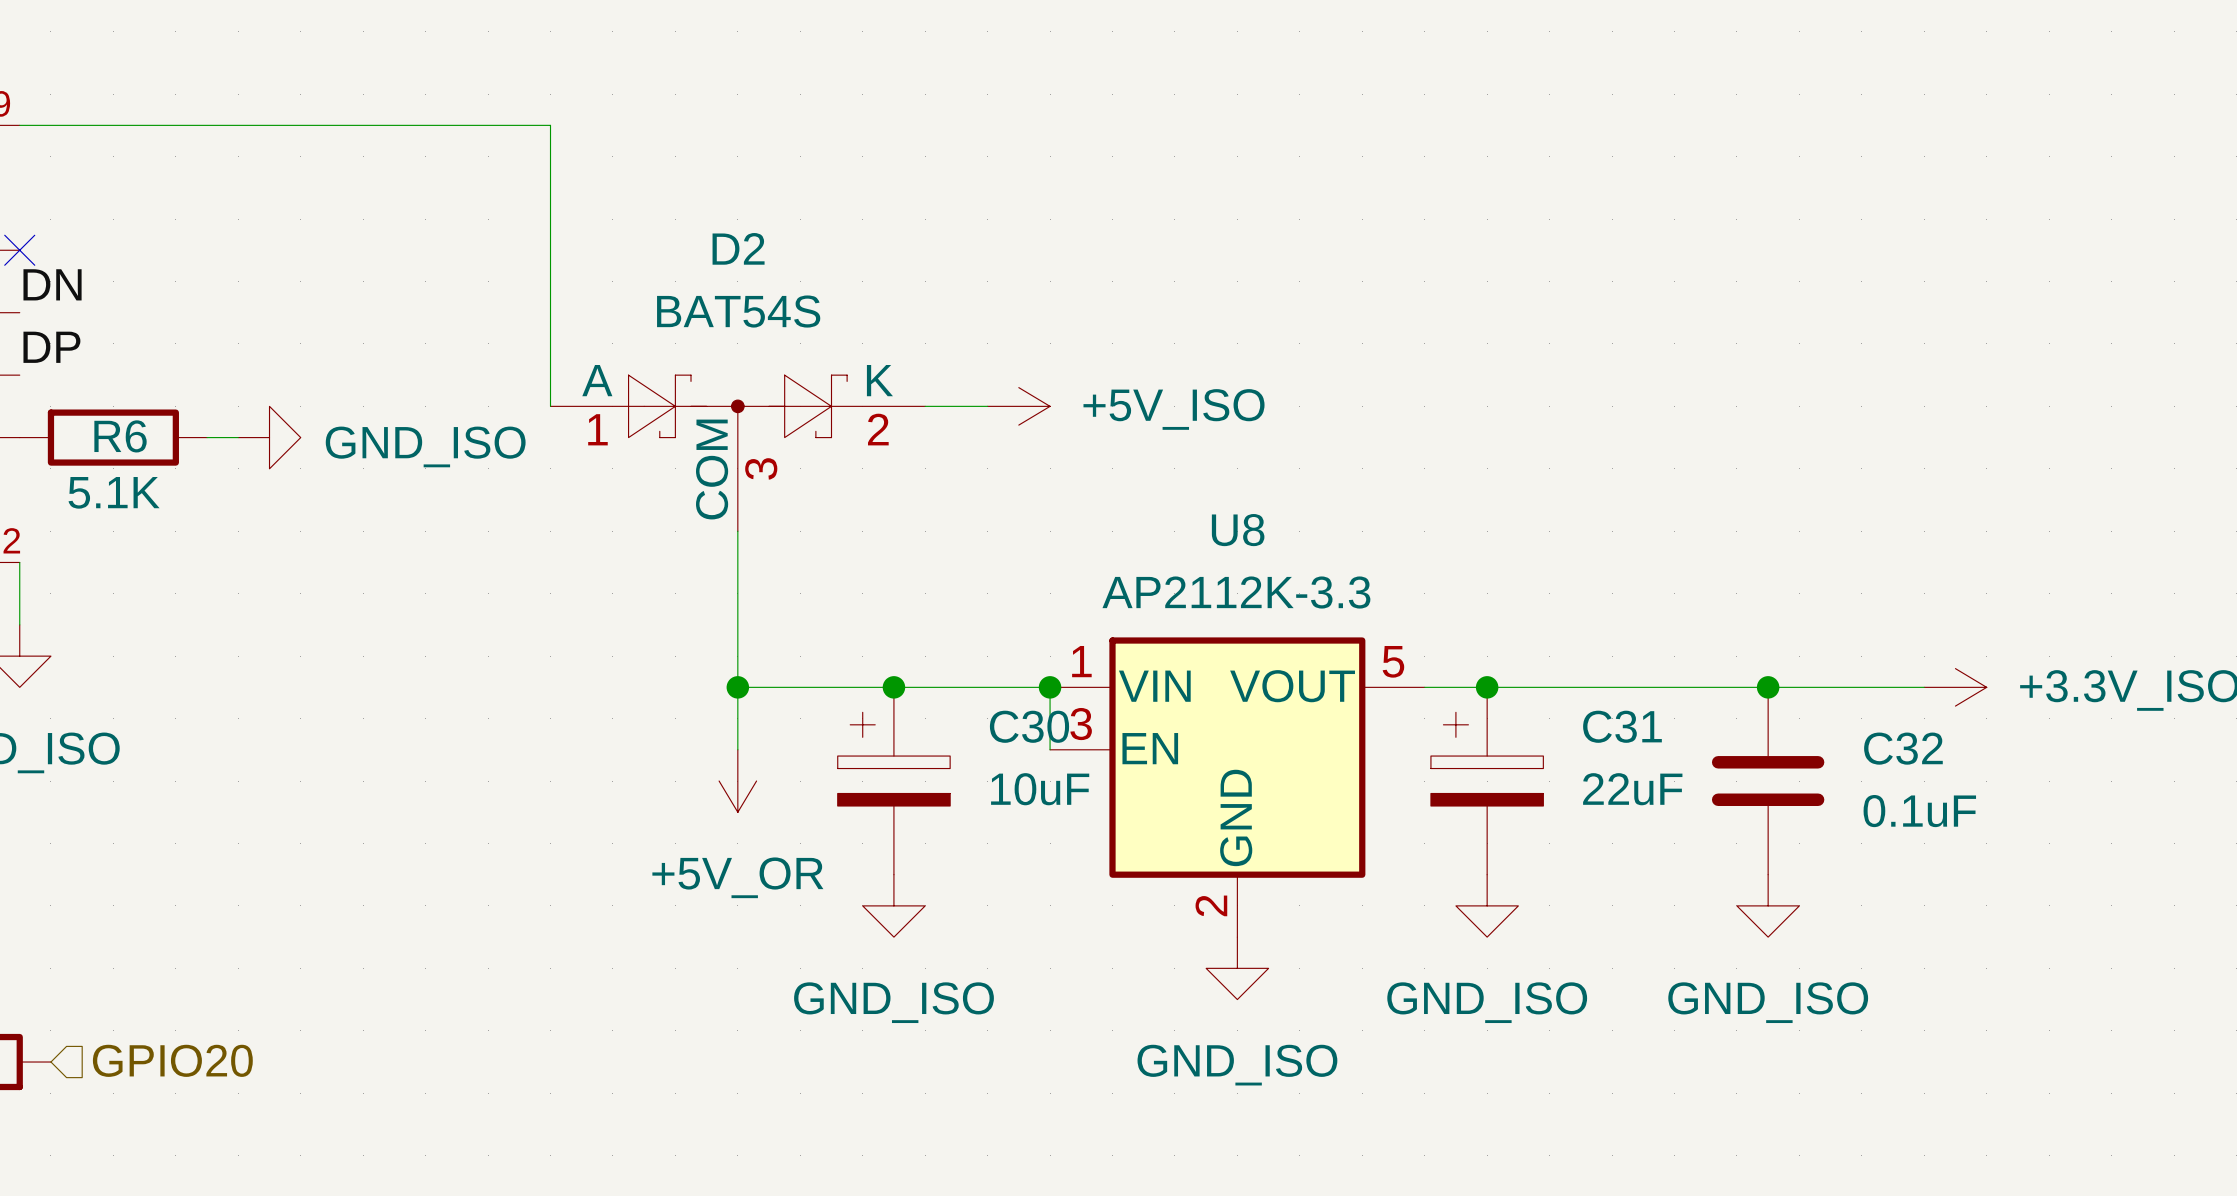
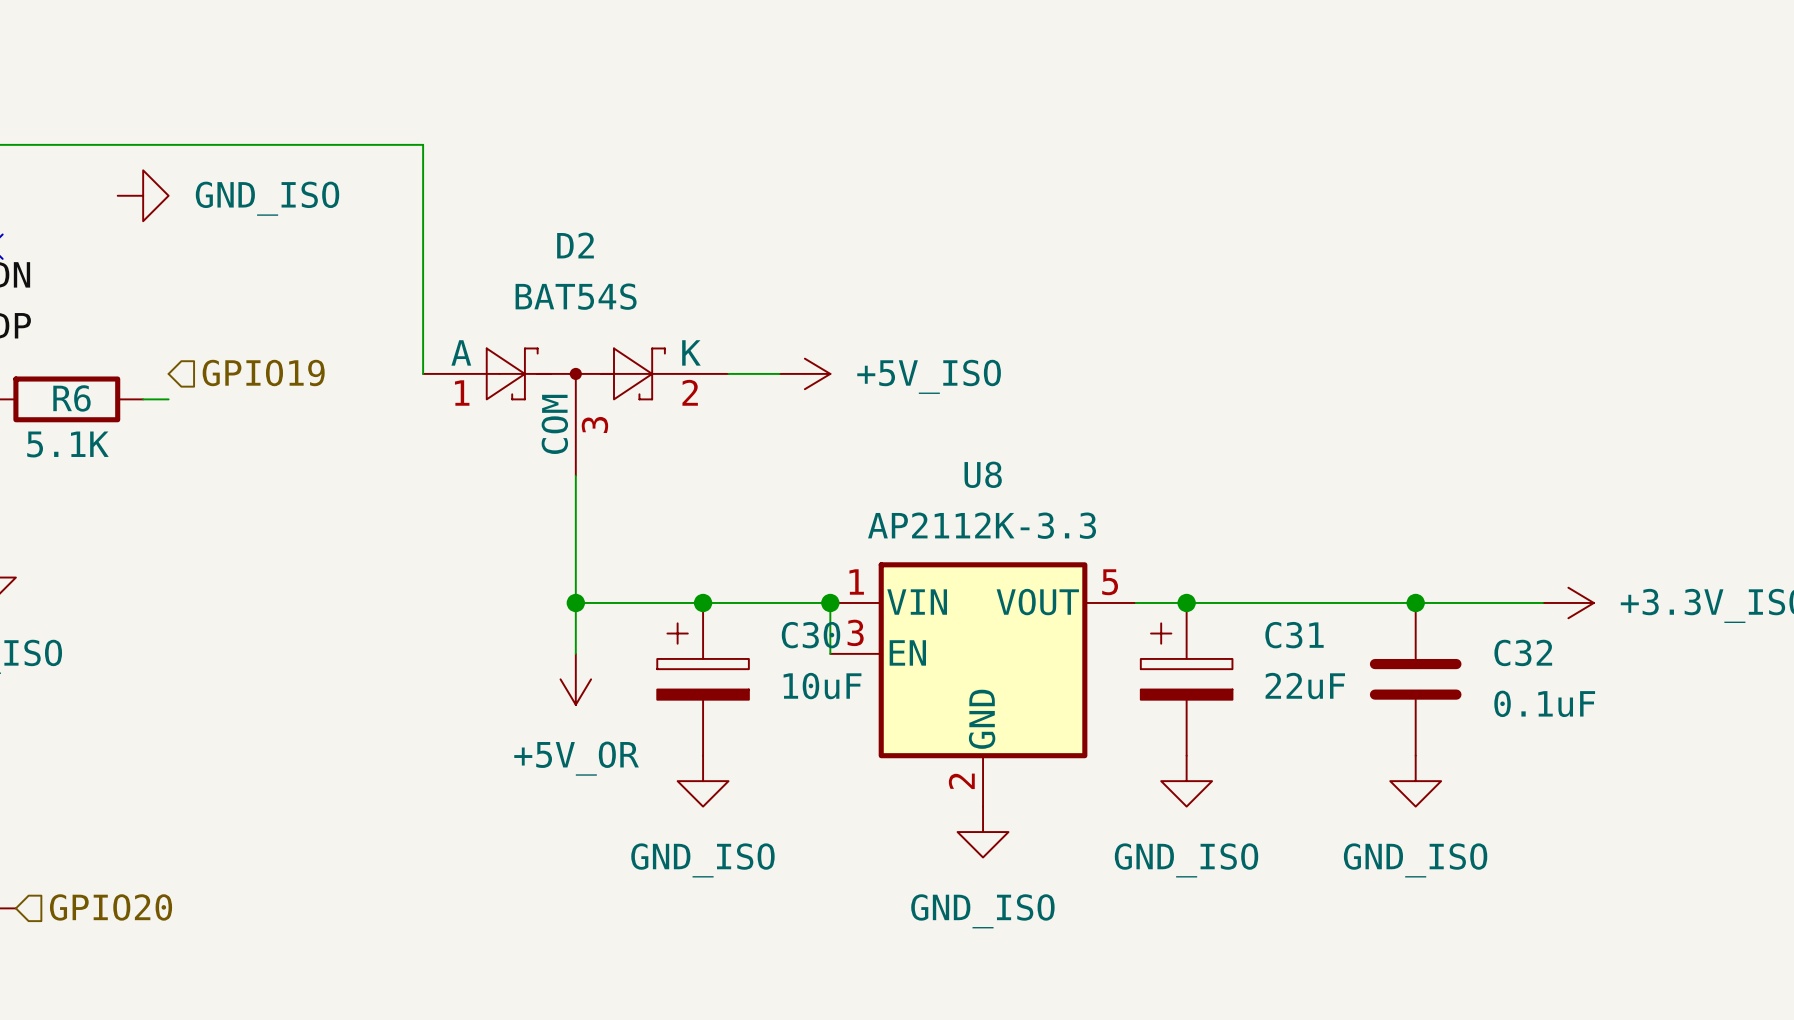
power symbol: none -> GND_ISO (143, 195)
hierarchical label: none -> GPIO19 (263, 372)
power symbol: GND_ISO (269, 437) -> none

